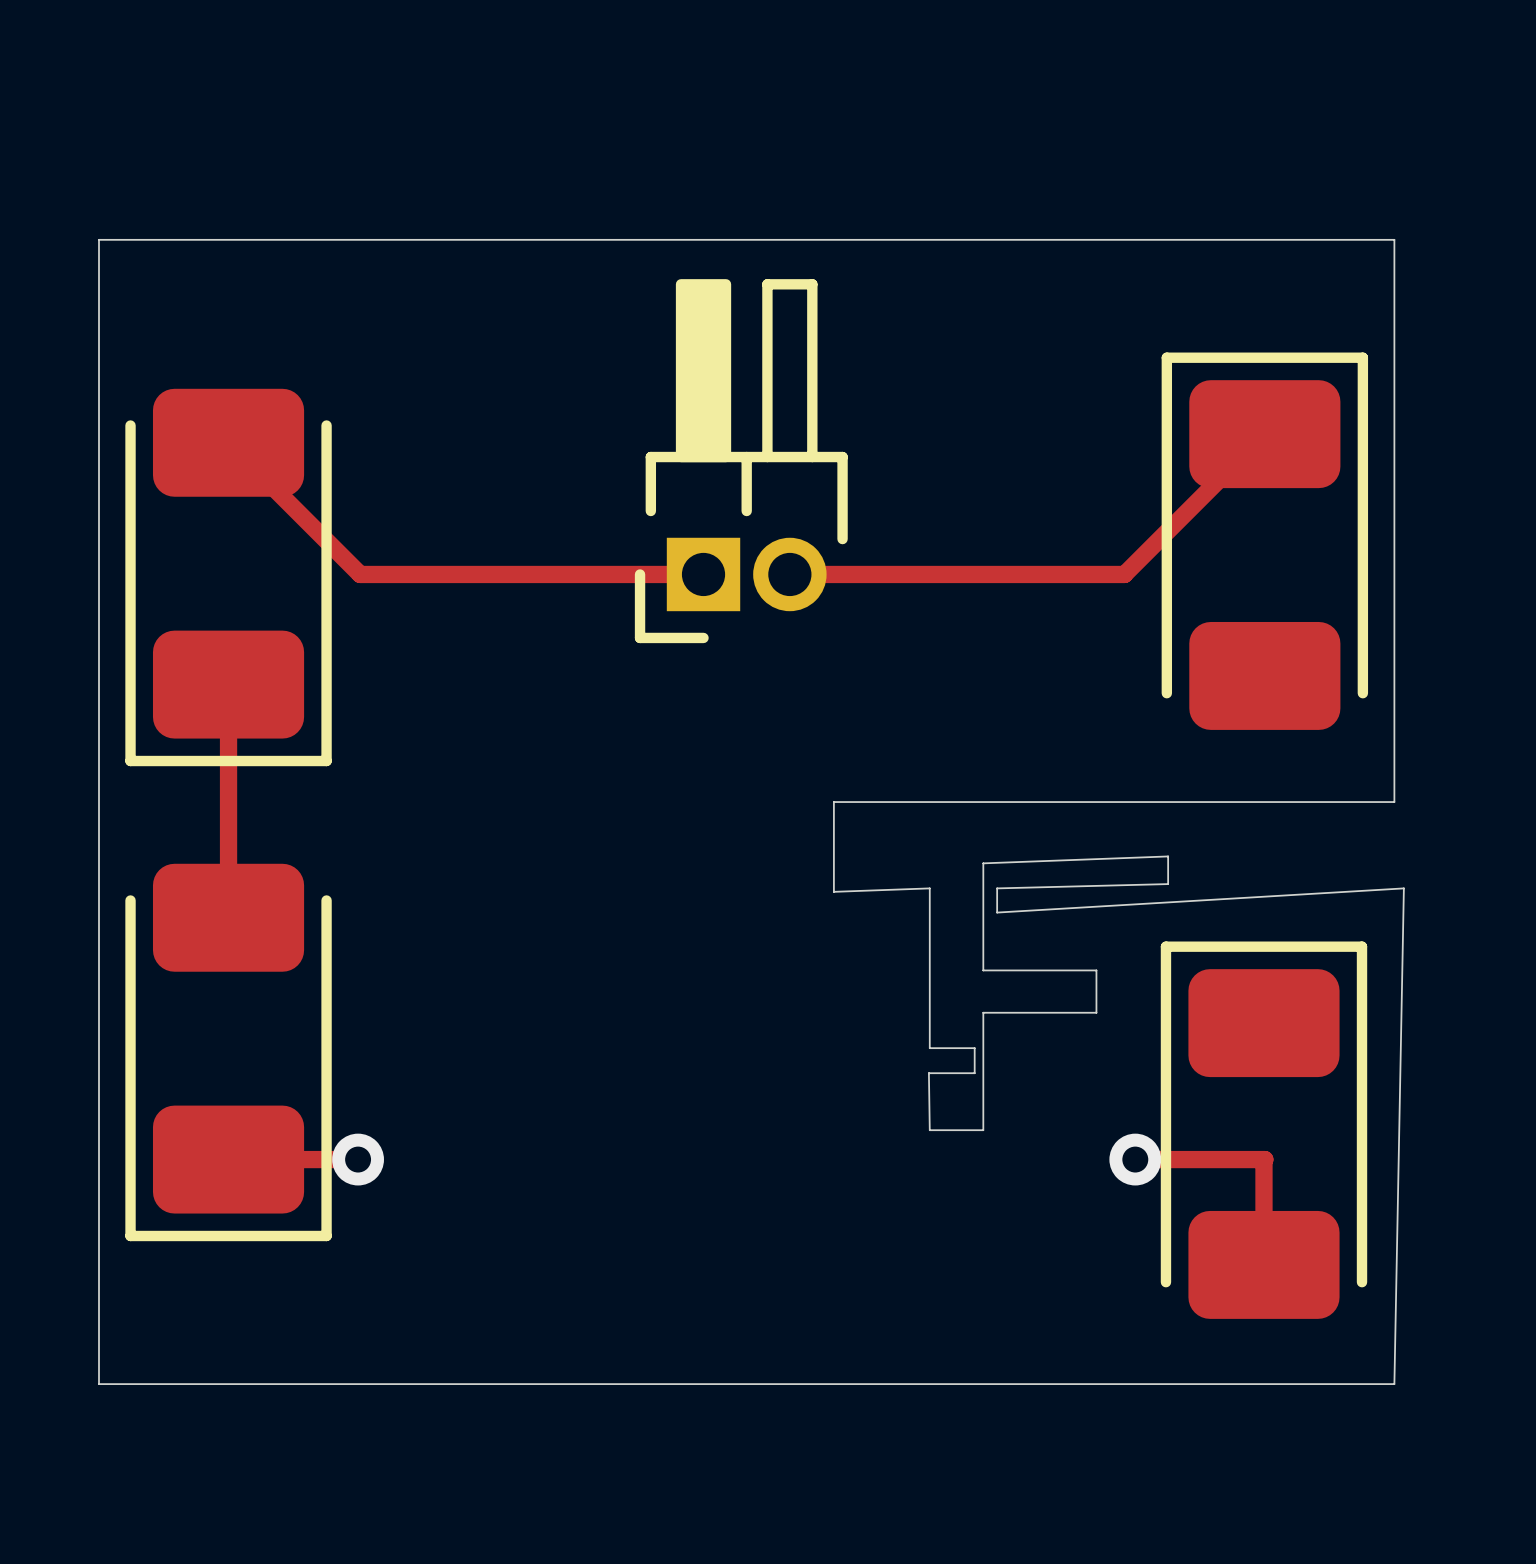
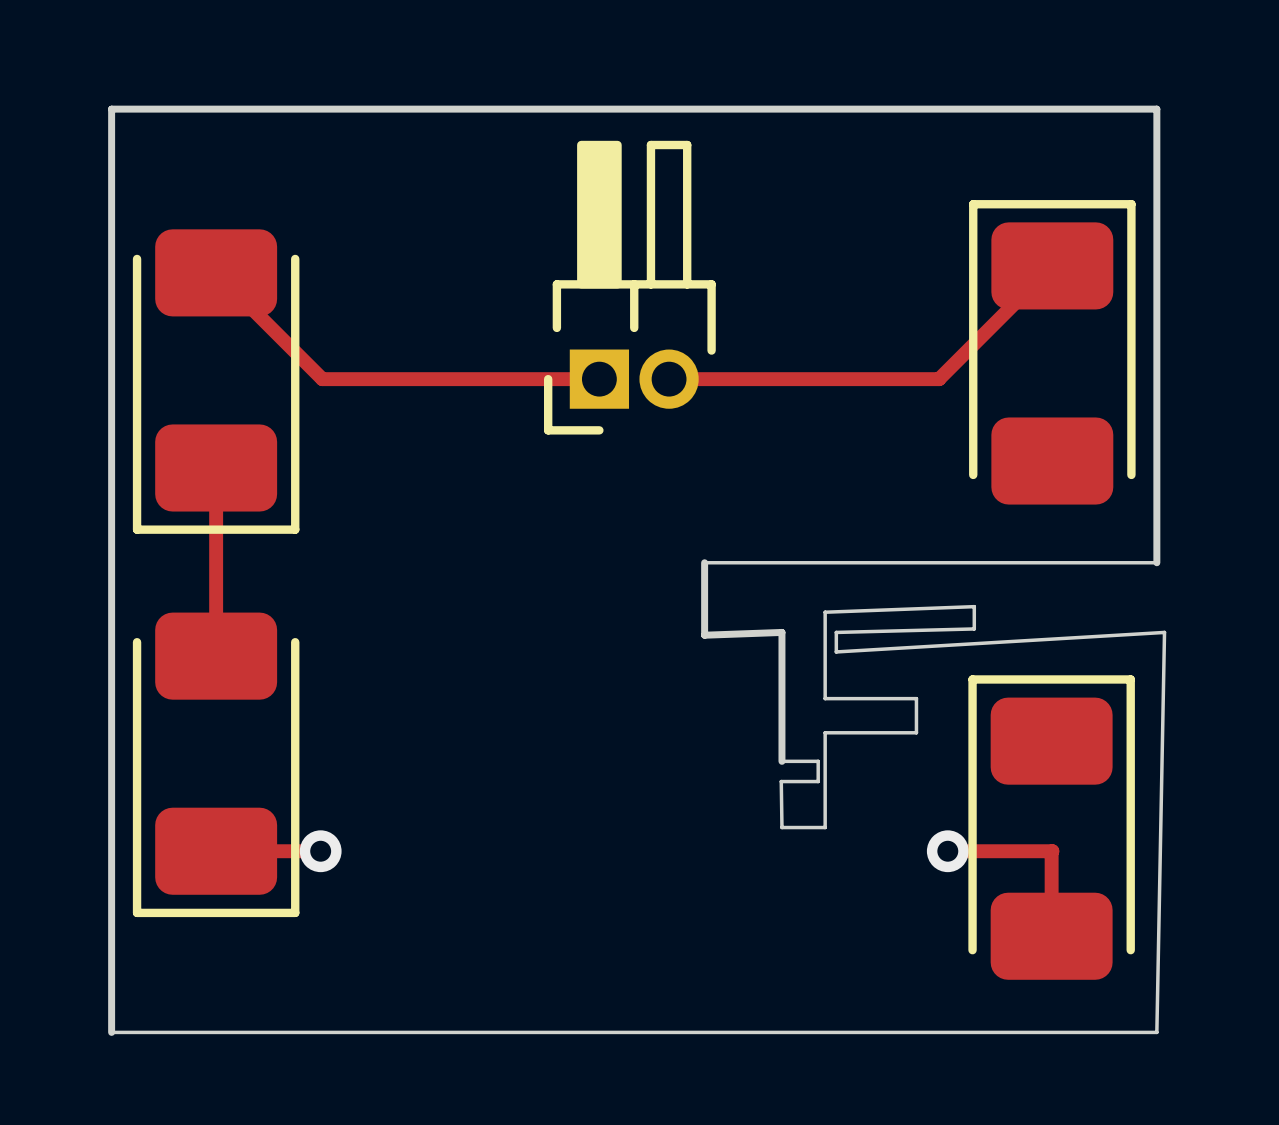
board edge width: thin (99, 239) (1394, 239) (1394, 802) (833, 802) (833, 891) (929, 888) (929, 1048) (974, 1048) (974, 1073) (928, 1073) (929, 1130) (983, 1130) (983, 1012) (1096, 1012) (1096, 970) (983, 970) (983, 863) (1168, 856) (1168, 884) (997, 888) (997, 912) (1403, 888) (1394, 1384) (99, 1384) (99, 239) -> thick (111, 109) (1156, 109) (1156, 562) (704, 562) (704, 635) (781, 632) (781, 761) (818, 761) (818, 781) (781, 781) (781, 827) (825, 827) (825, 732) (916, 732) (916, 698) (825, 698) (825, 612) (974, 606) (974, 628) (836, 632) (836, 651) (1164, 632) (1156, 1032) (111, 1032) (111, 109)

